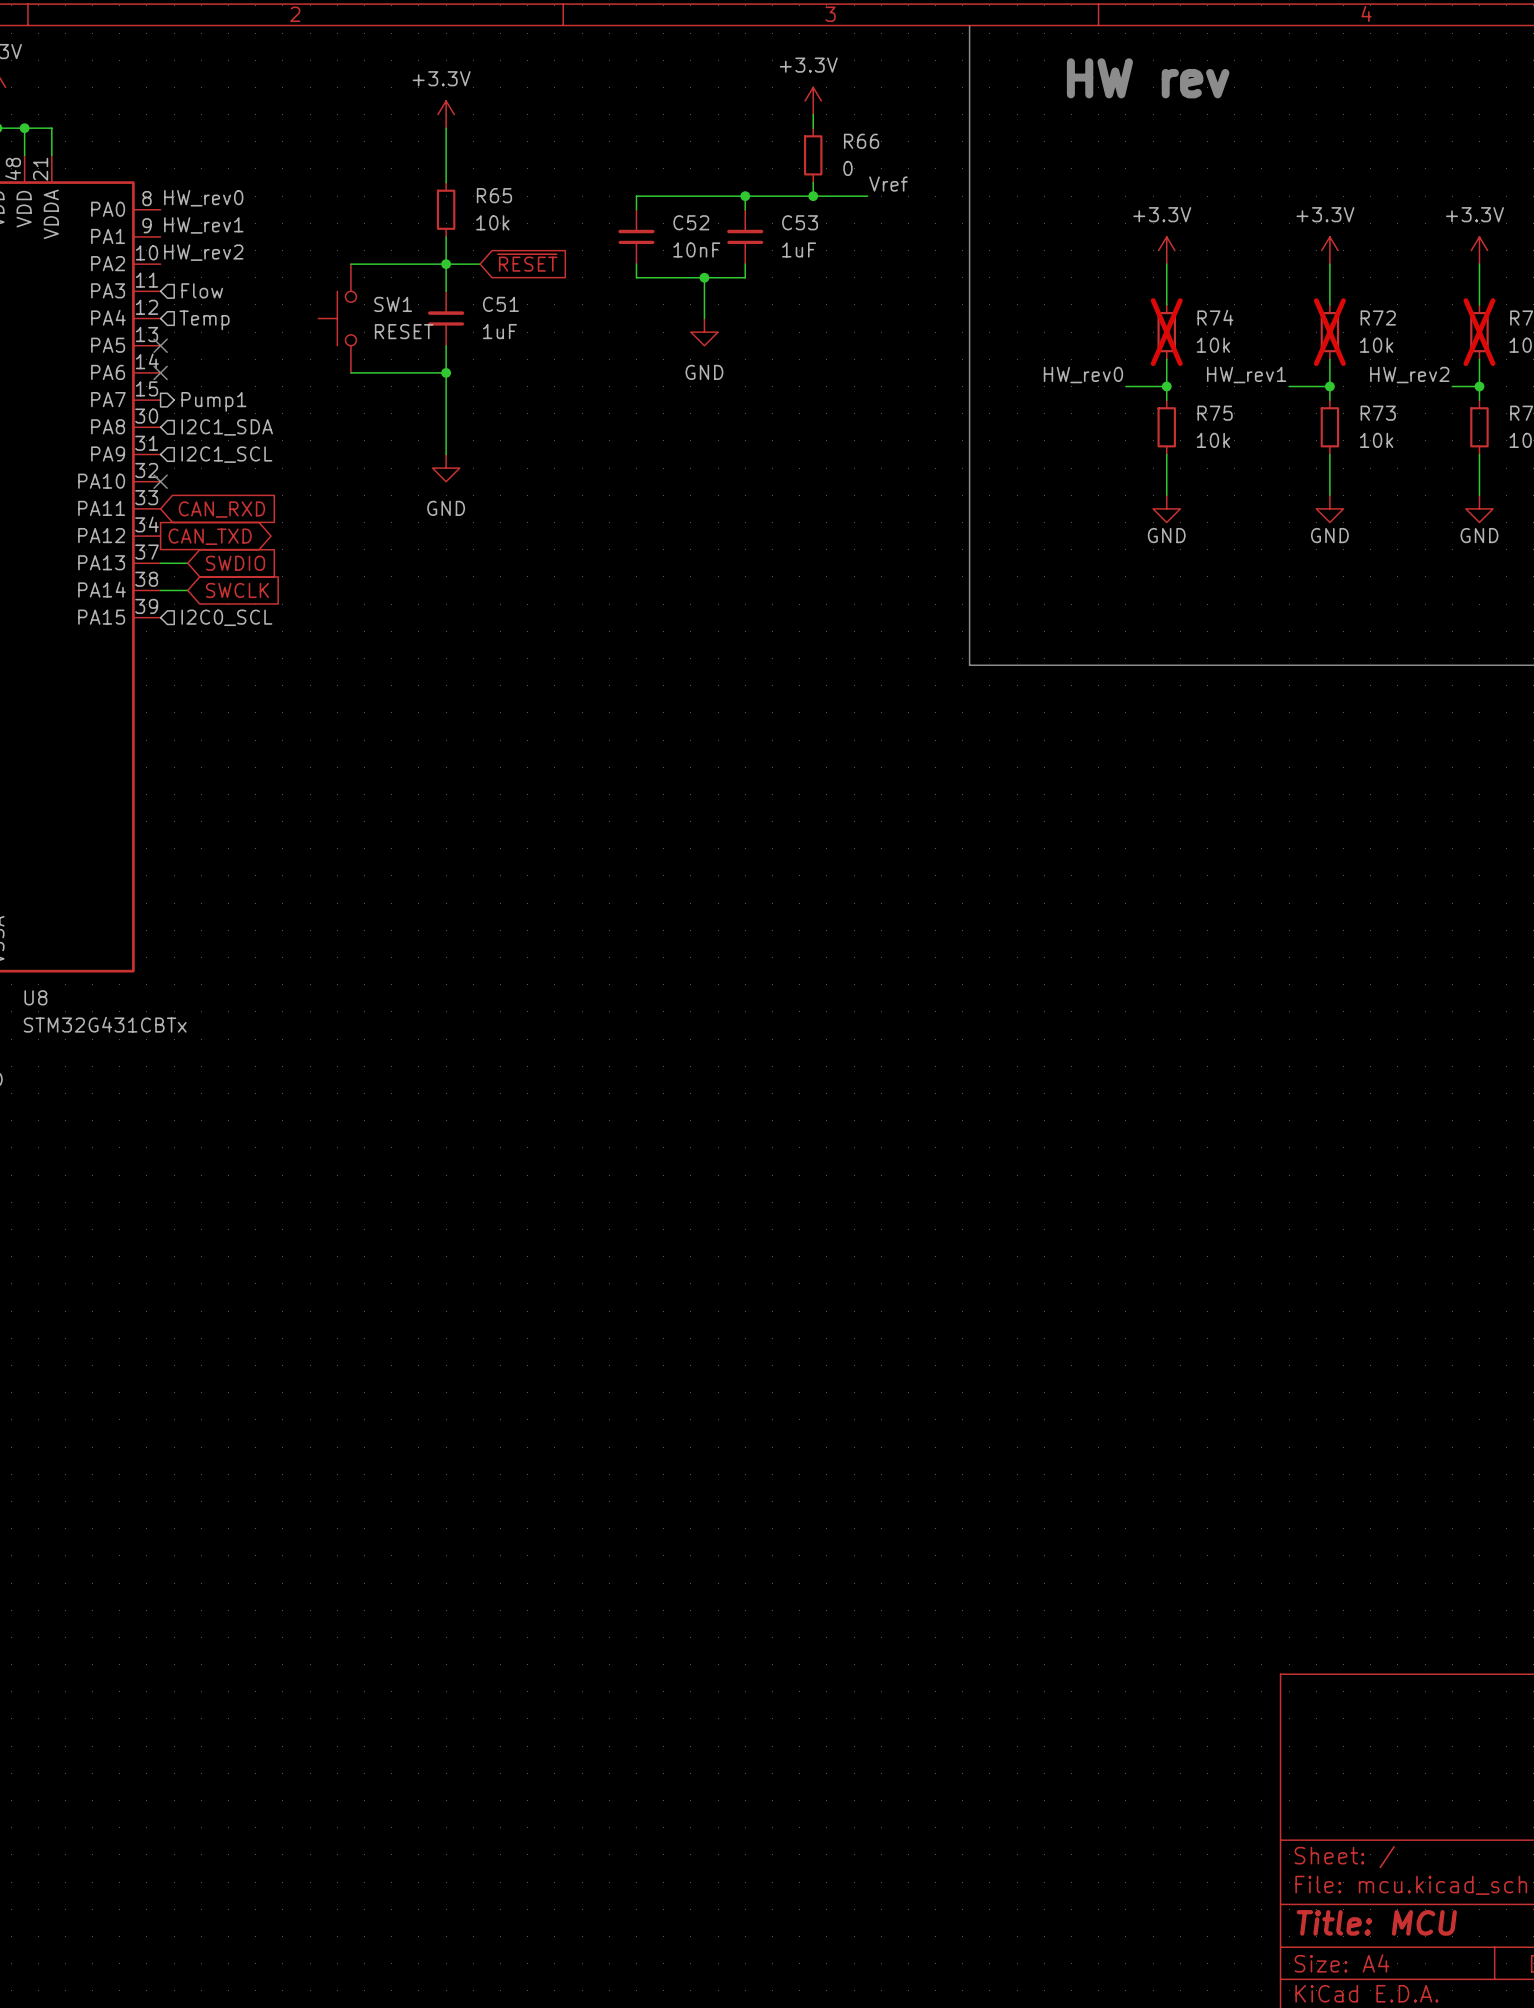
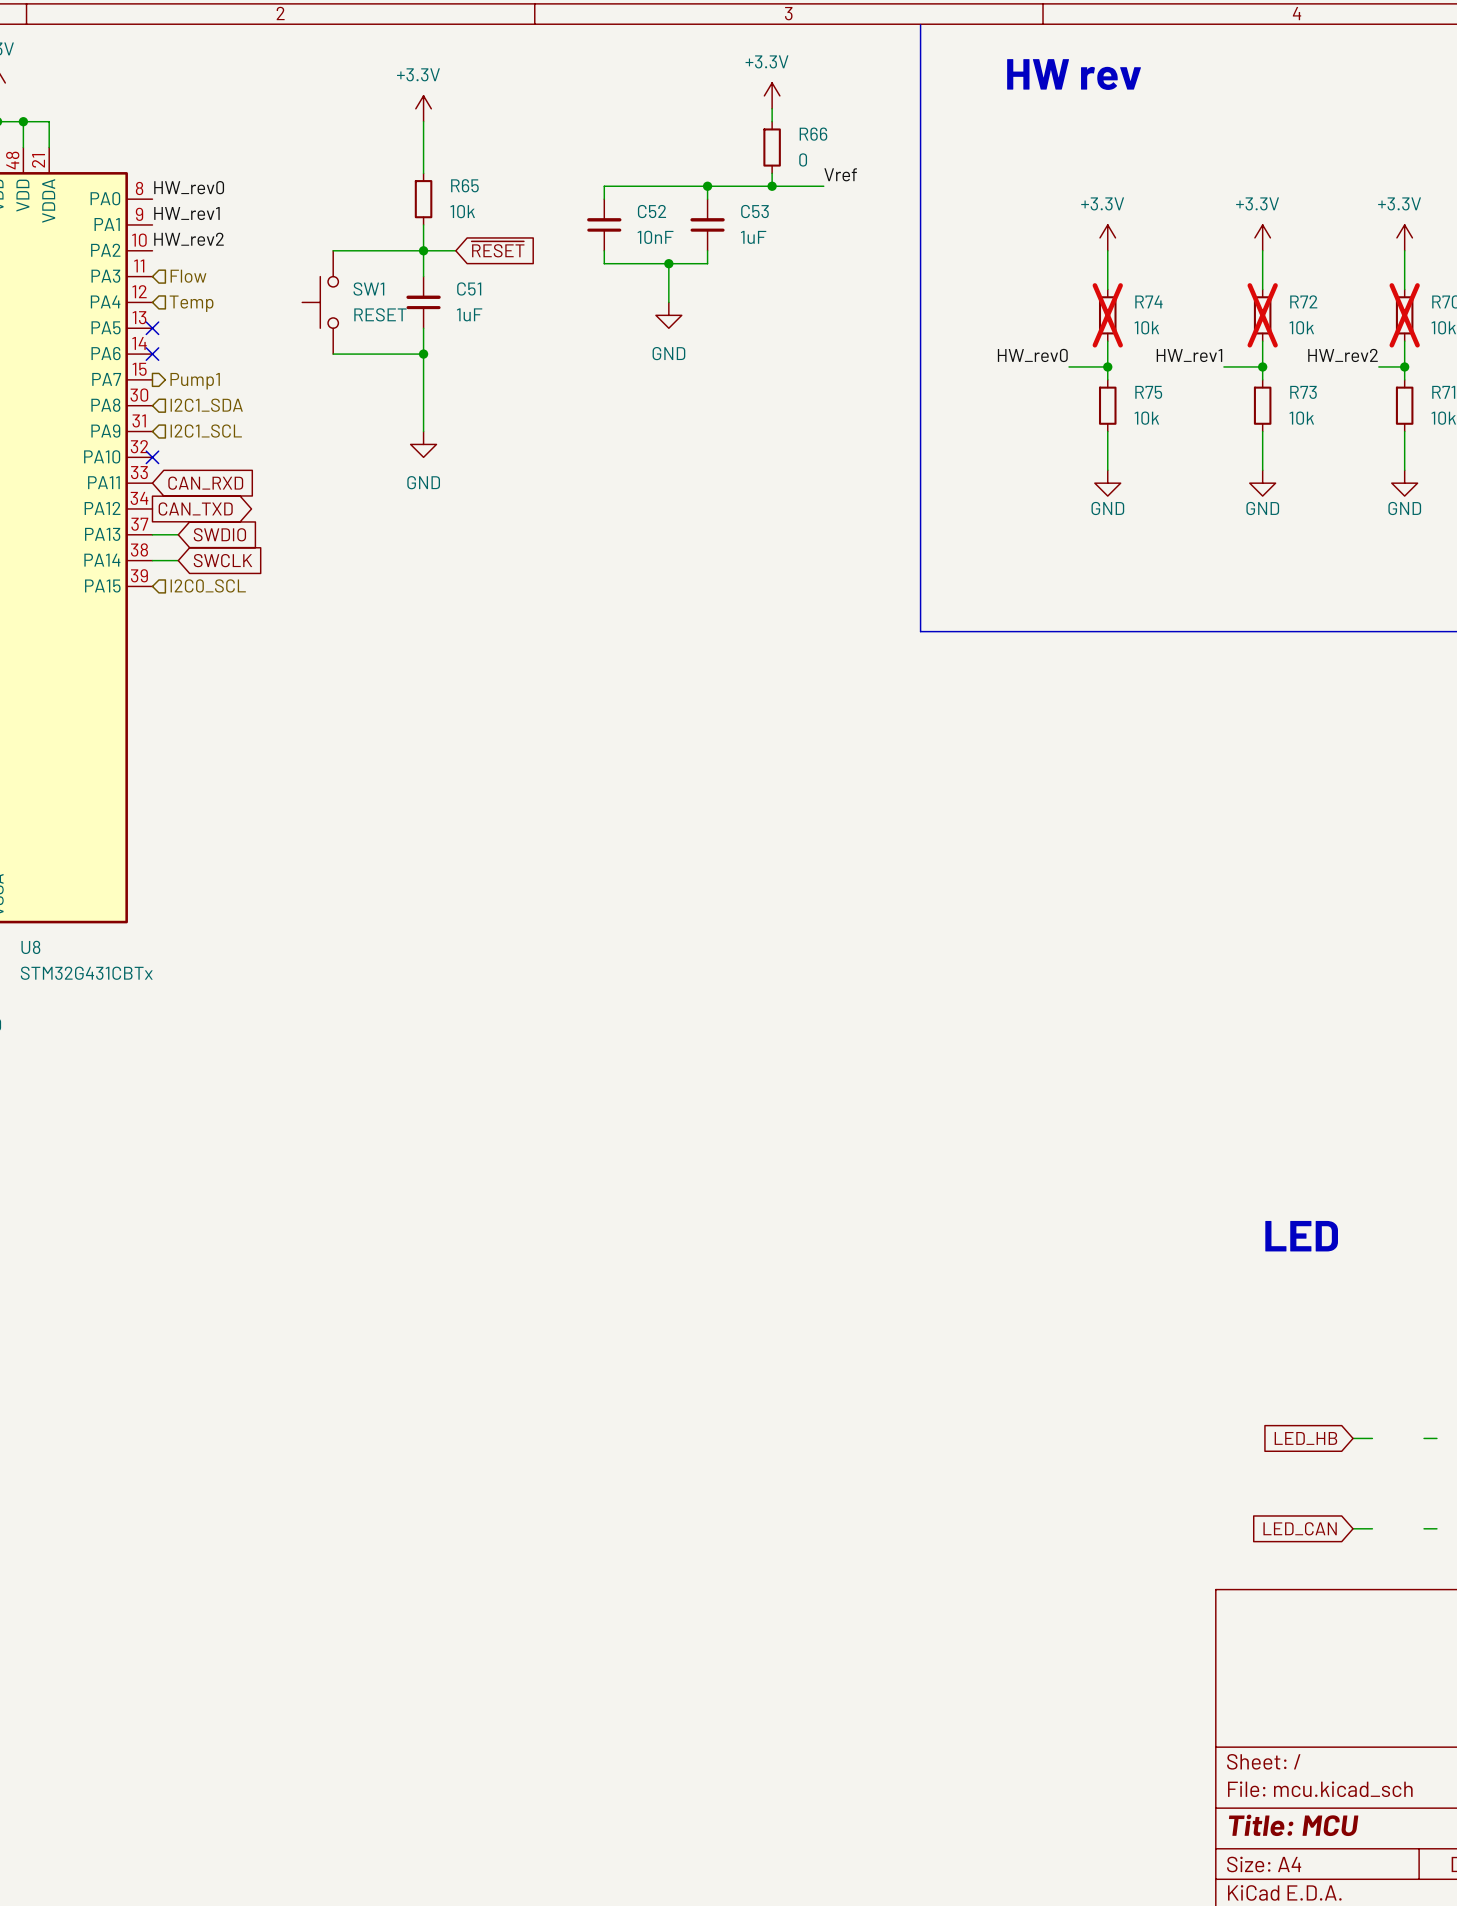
text: none -> LED (1301, 1236)
global label: none -> LED_HB (1305, 1438)
wire: none -> (1353, 1438) (1372, 1438)
wire: none -> (1424, 1438) (1436, 1438)
global label: none -> LED_CAN (1300, 1528)
wire: none -> (1353, 1528) (1372, 1528)
wire: none -> (1424, 1528) (1436, 1528)

